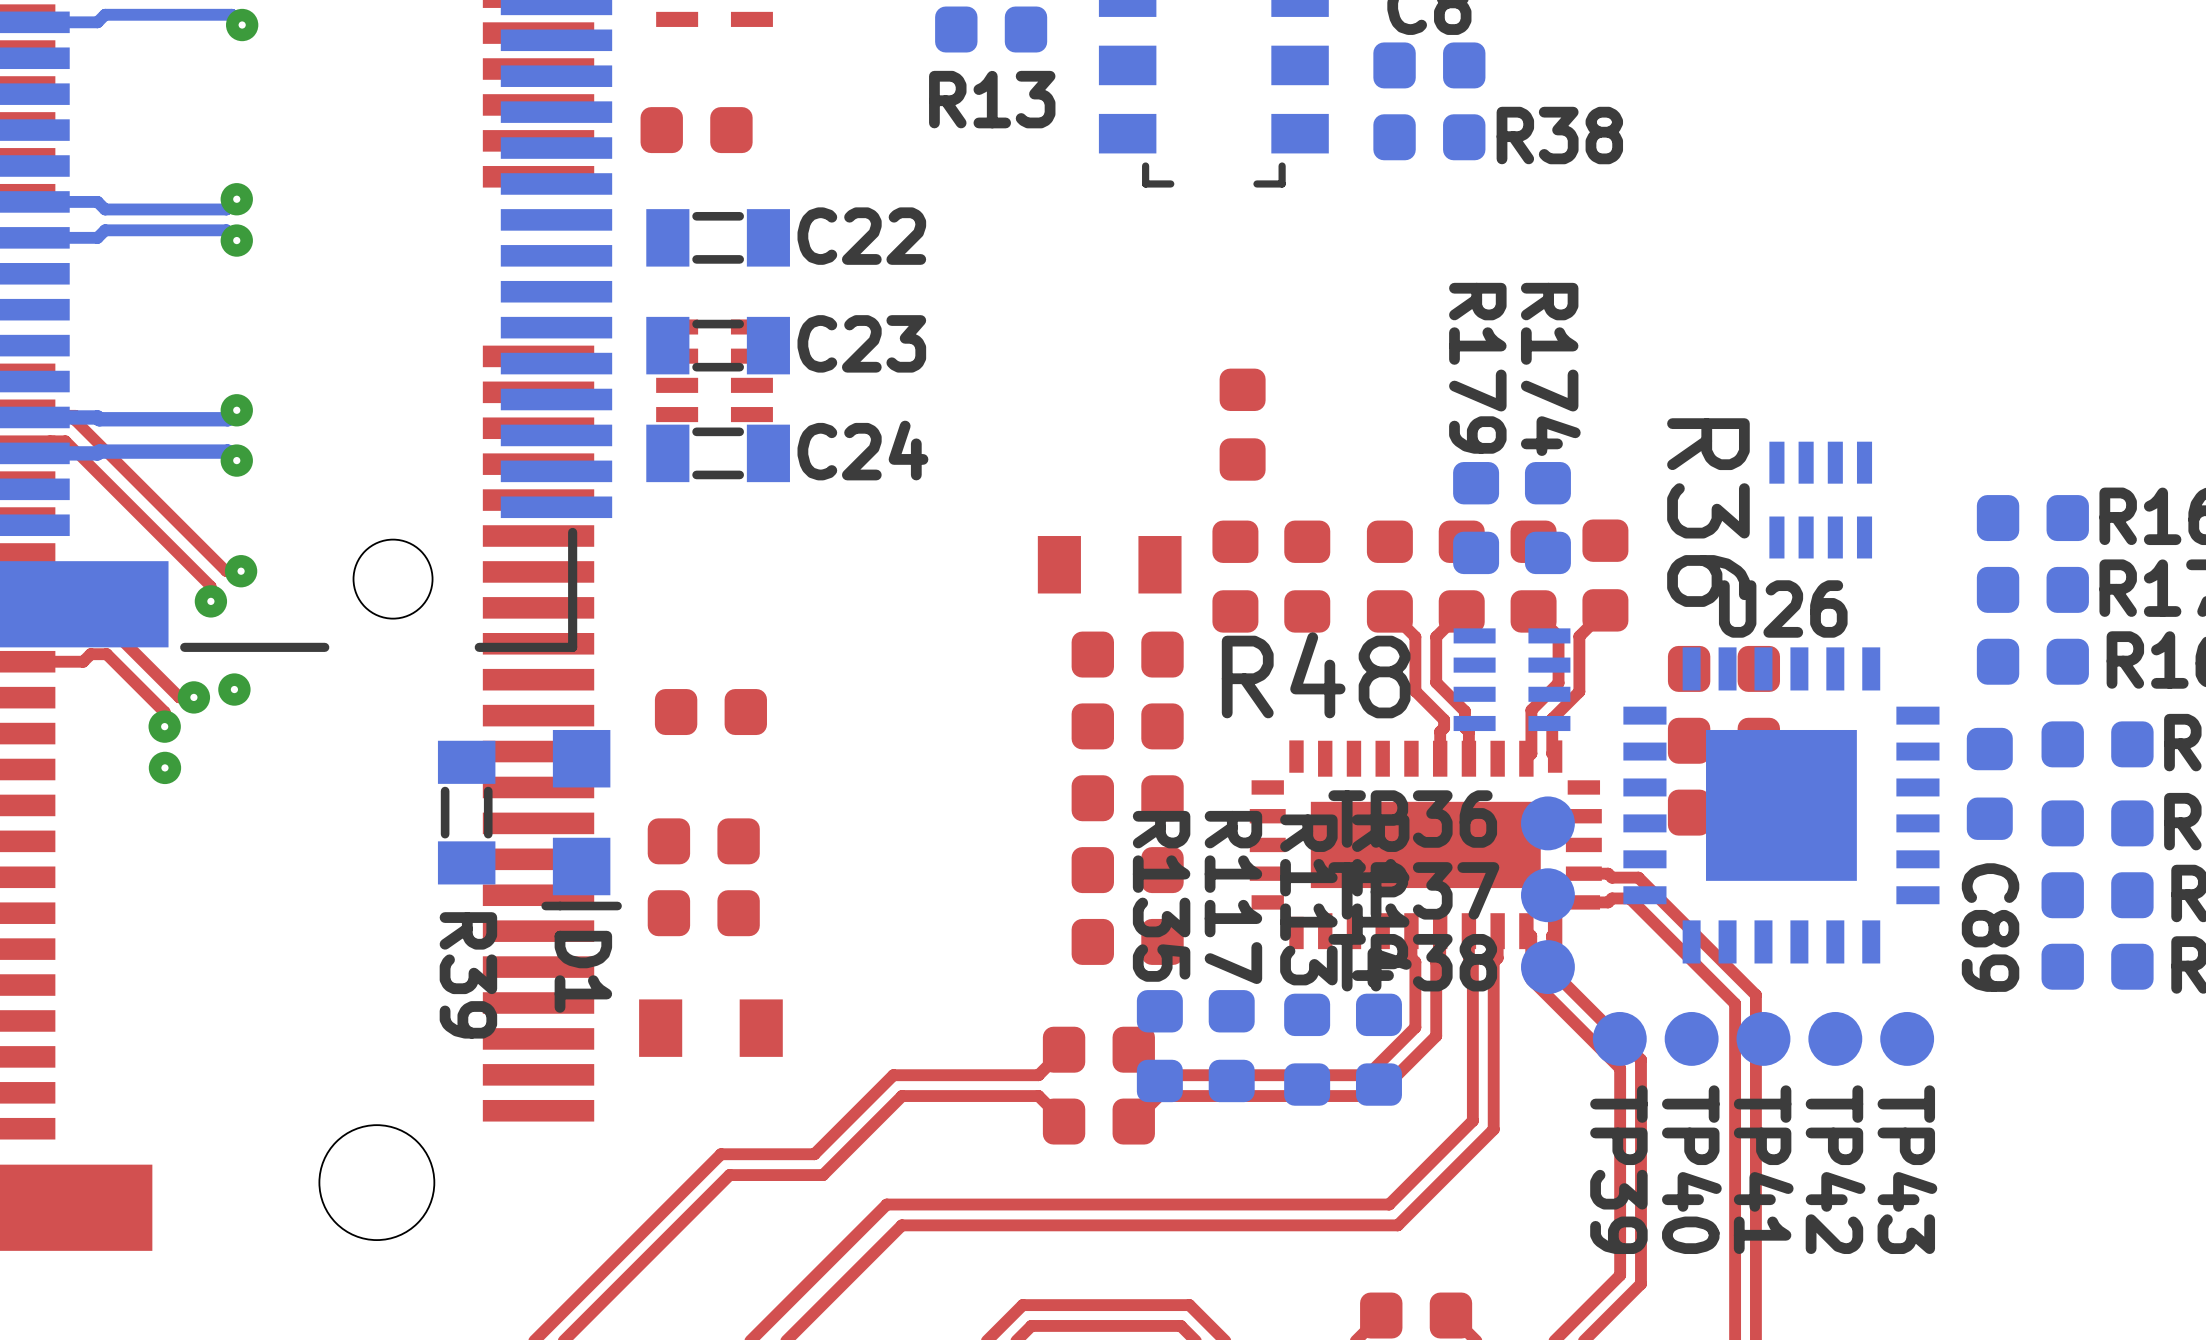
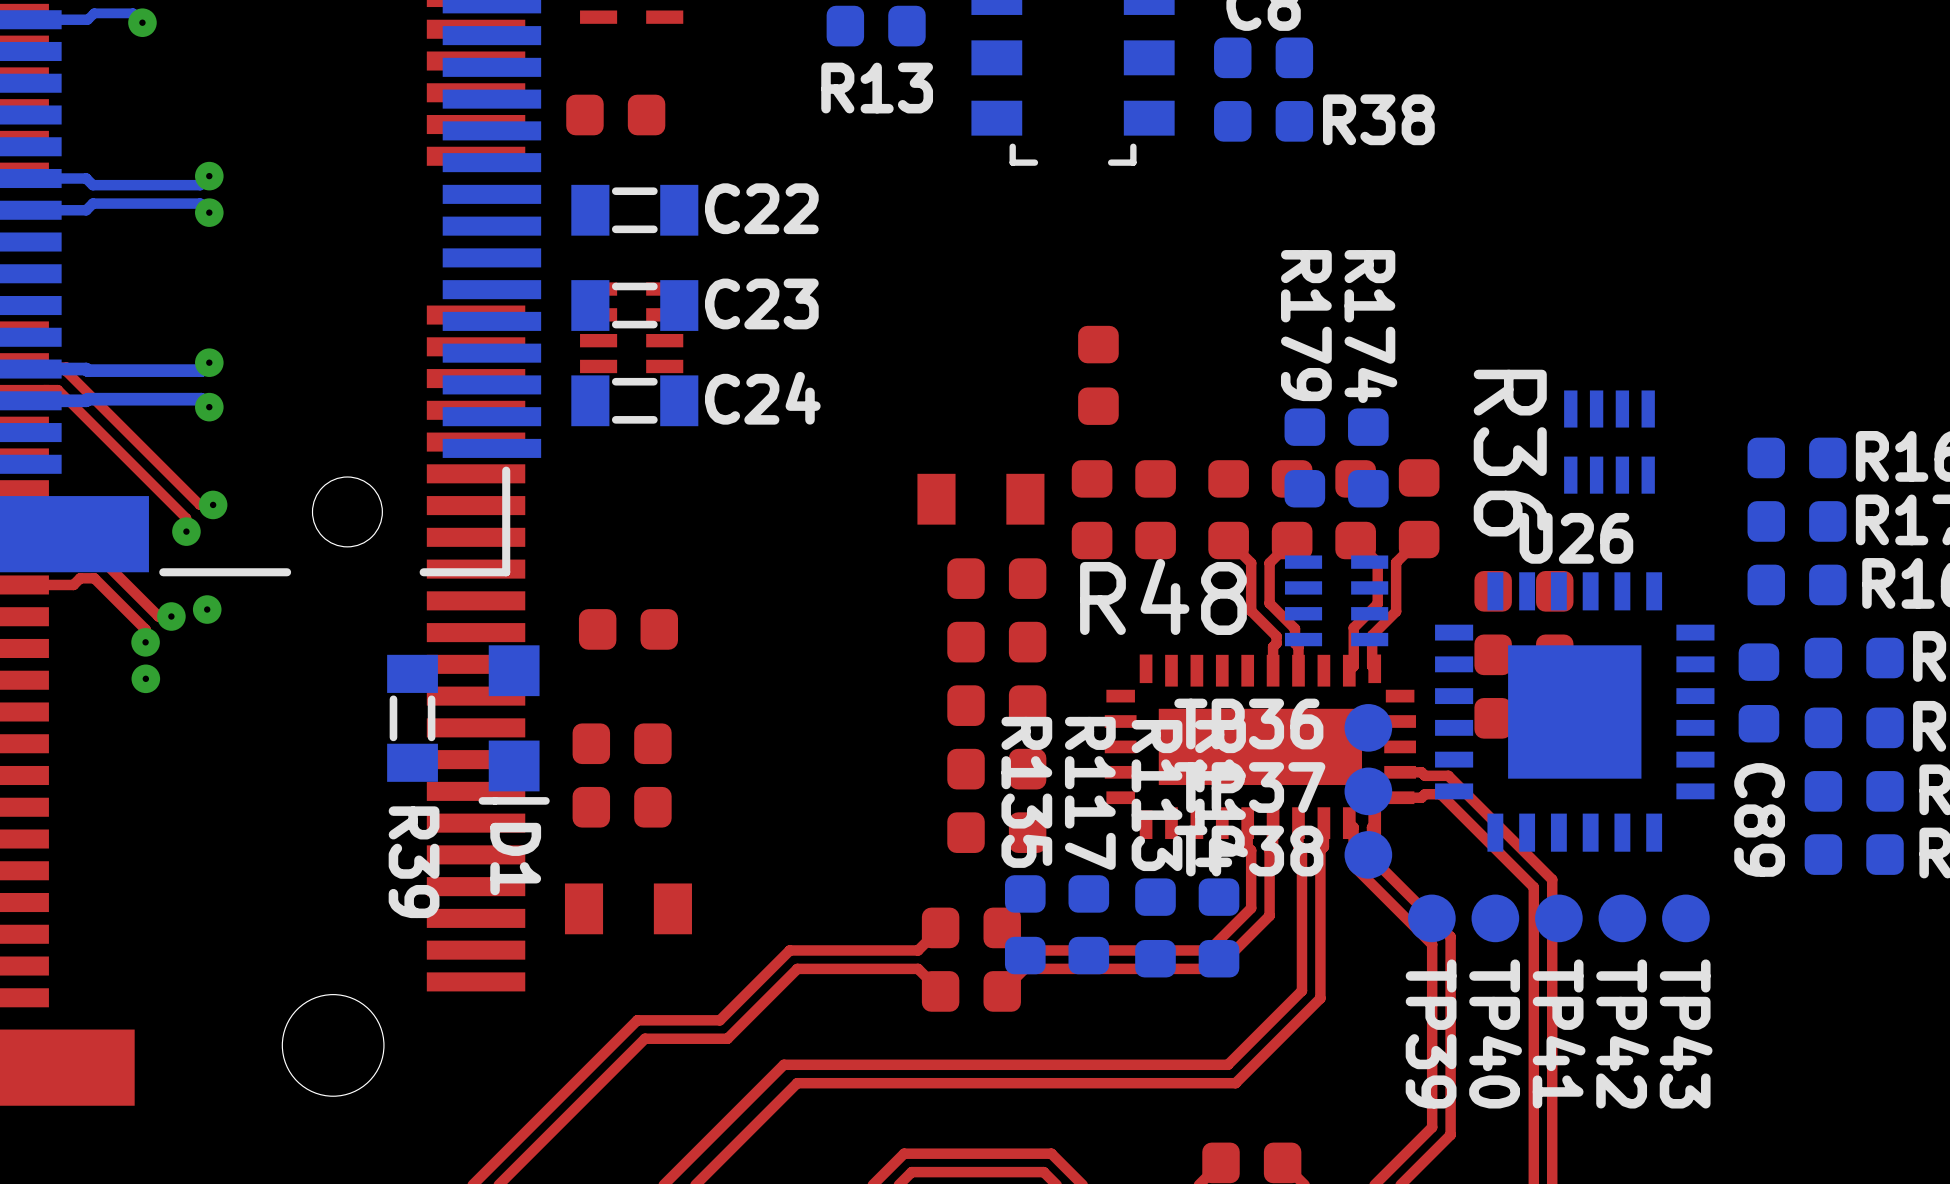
bottom track: (97, 22) (105, 14) (231, 14) (242, 25) -> (86, 19) (94, 13) (133, 13) (142, 22)
via: none -> (142, 22)
via: (242, 25) -> none

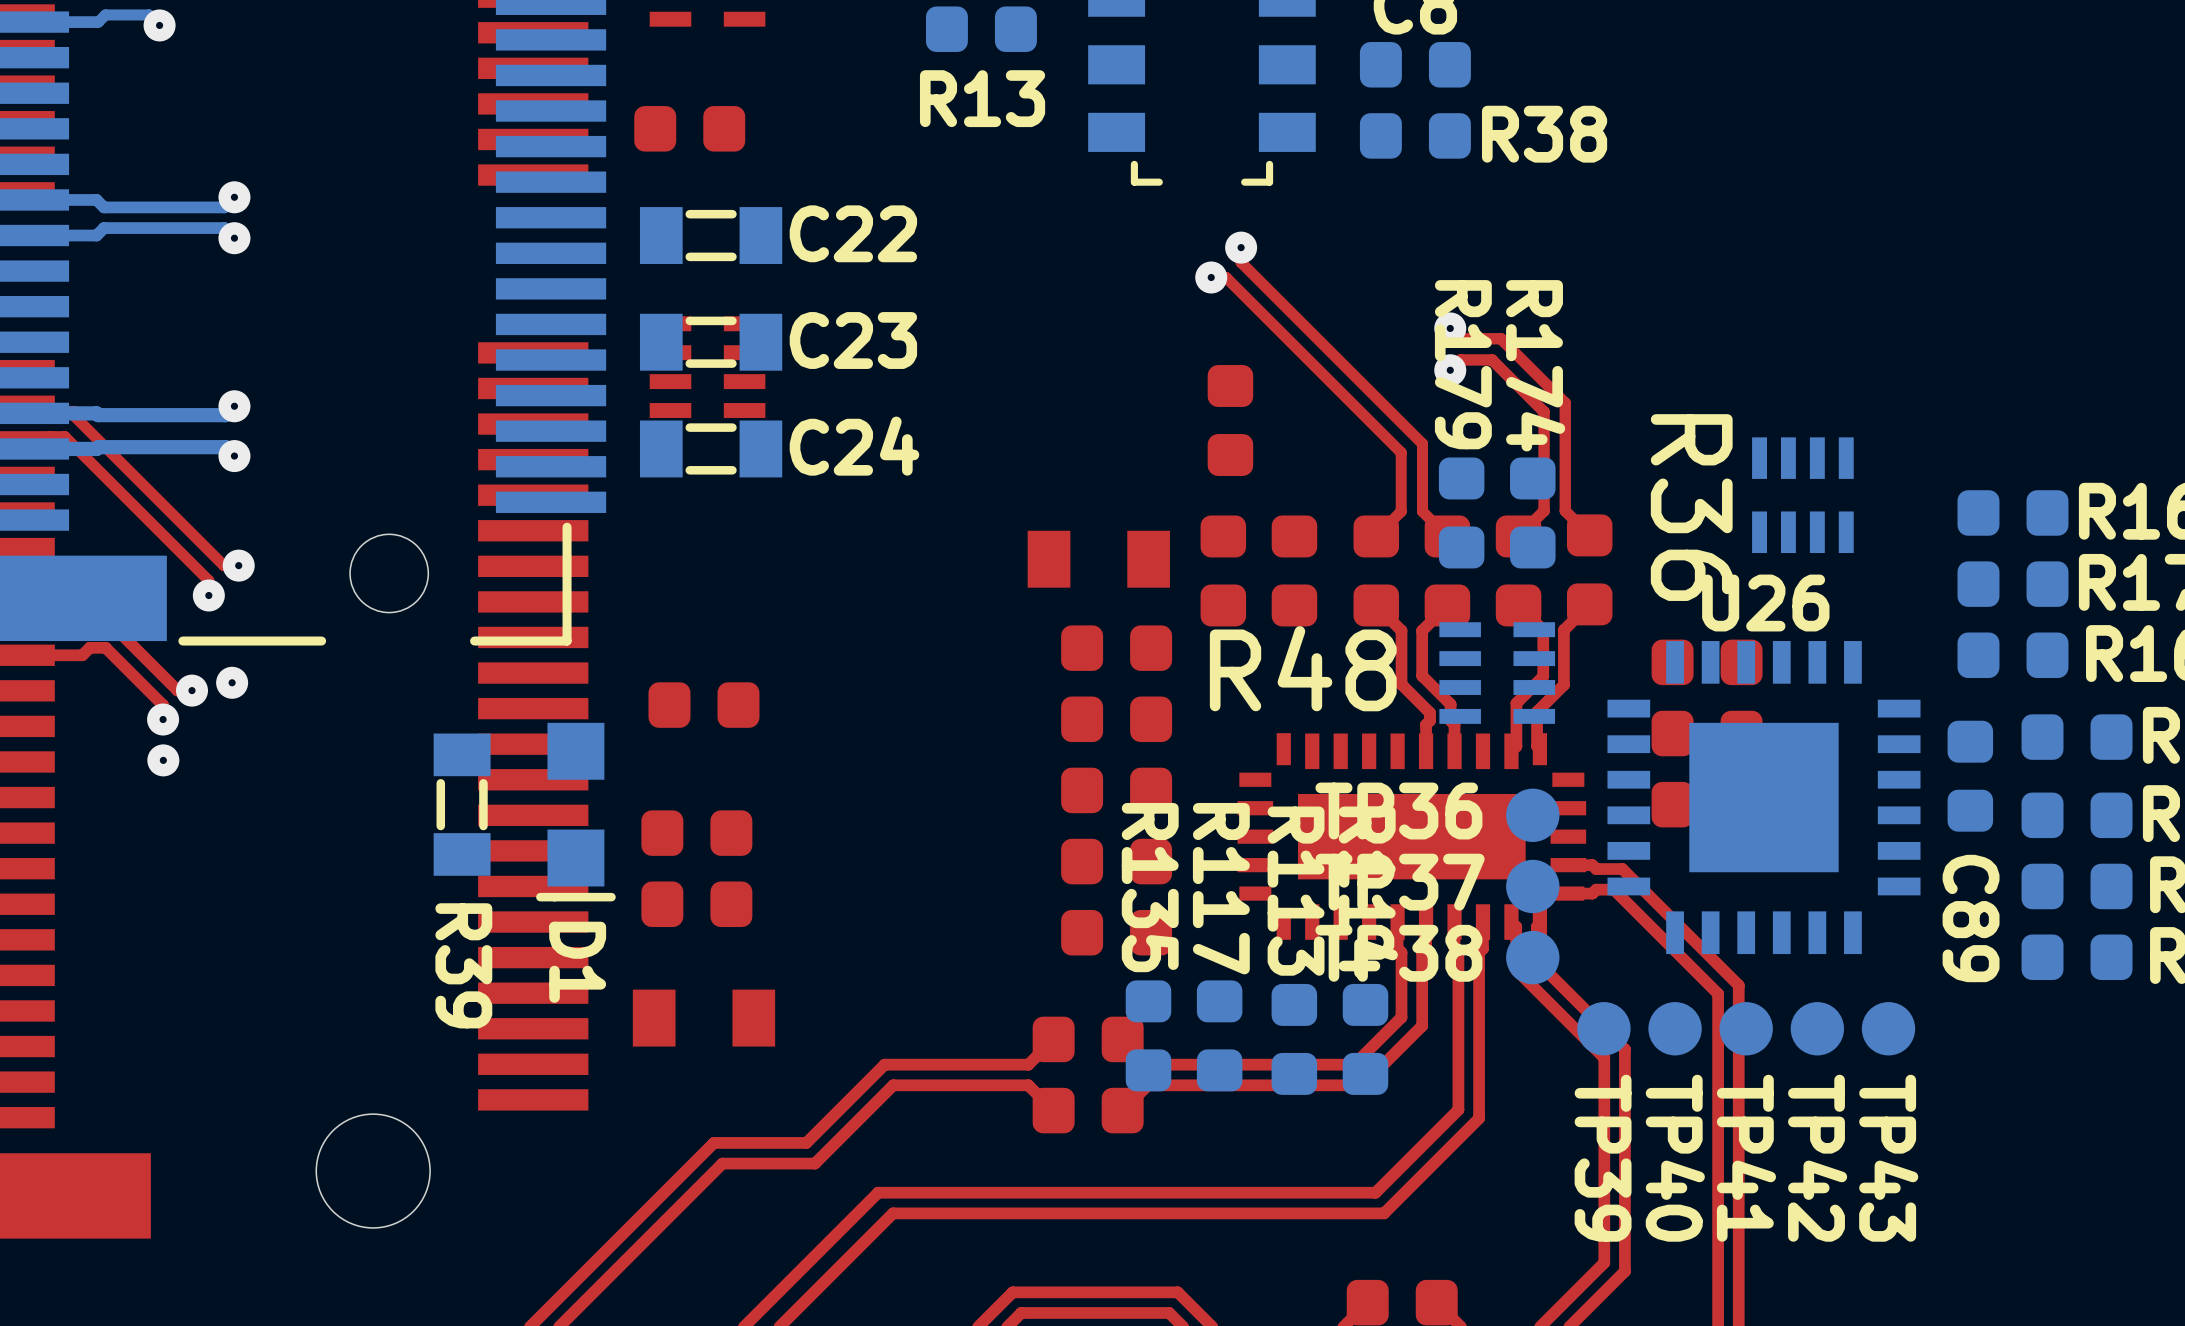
top track: none -> (1241, 247) (1241, 262) (1422, 443) (1422, 511) (1447, 536)
via: none -> (1241, 247)
top track: none -> (1211, 277) (1226, 277) (1401, 452) (1401, 511) (1376, 536)
via: none -> (1211, 277)
top track: none -> (1450, 328) (1460, 338) (1500, 338) (1565, 403) (1565, 510) (1589, 535)
via: none -> (1450, 328)
top track: none -> (1450, 370) (1460, 359) (1492, 359) (1544, 411) (1544, 510) (1518, 536)
via: none -> (1450, 370)

